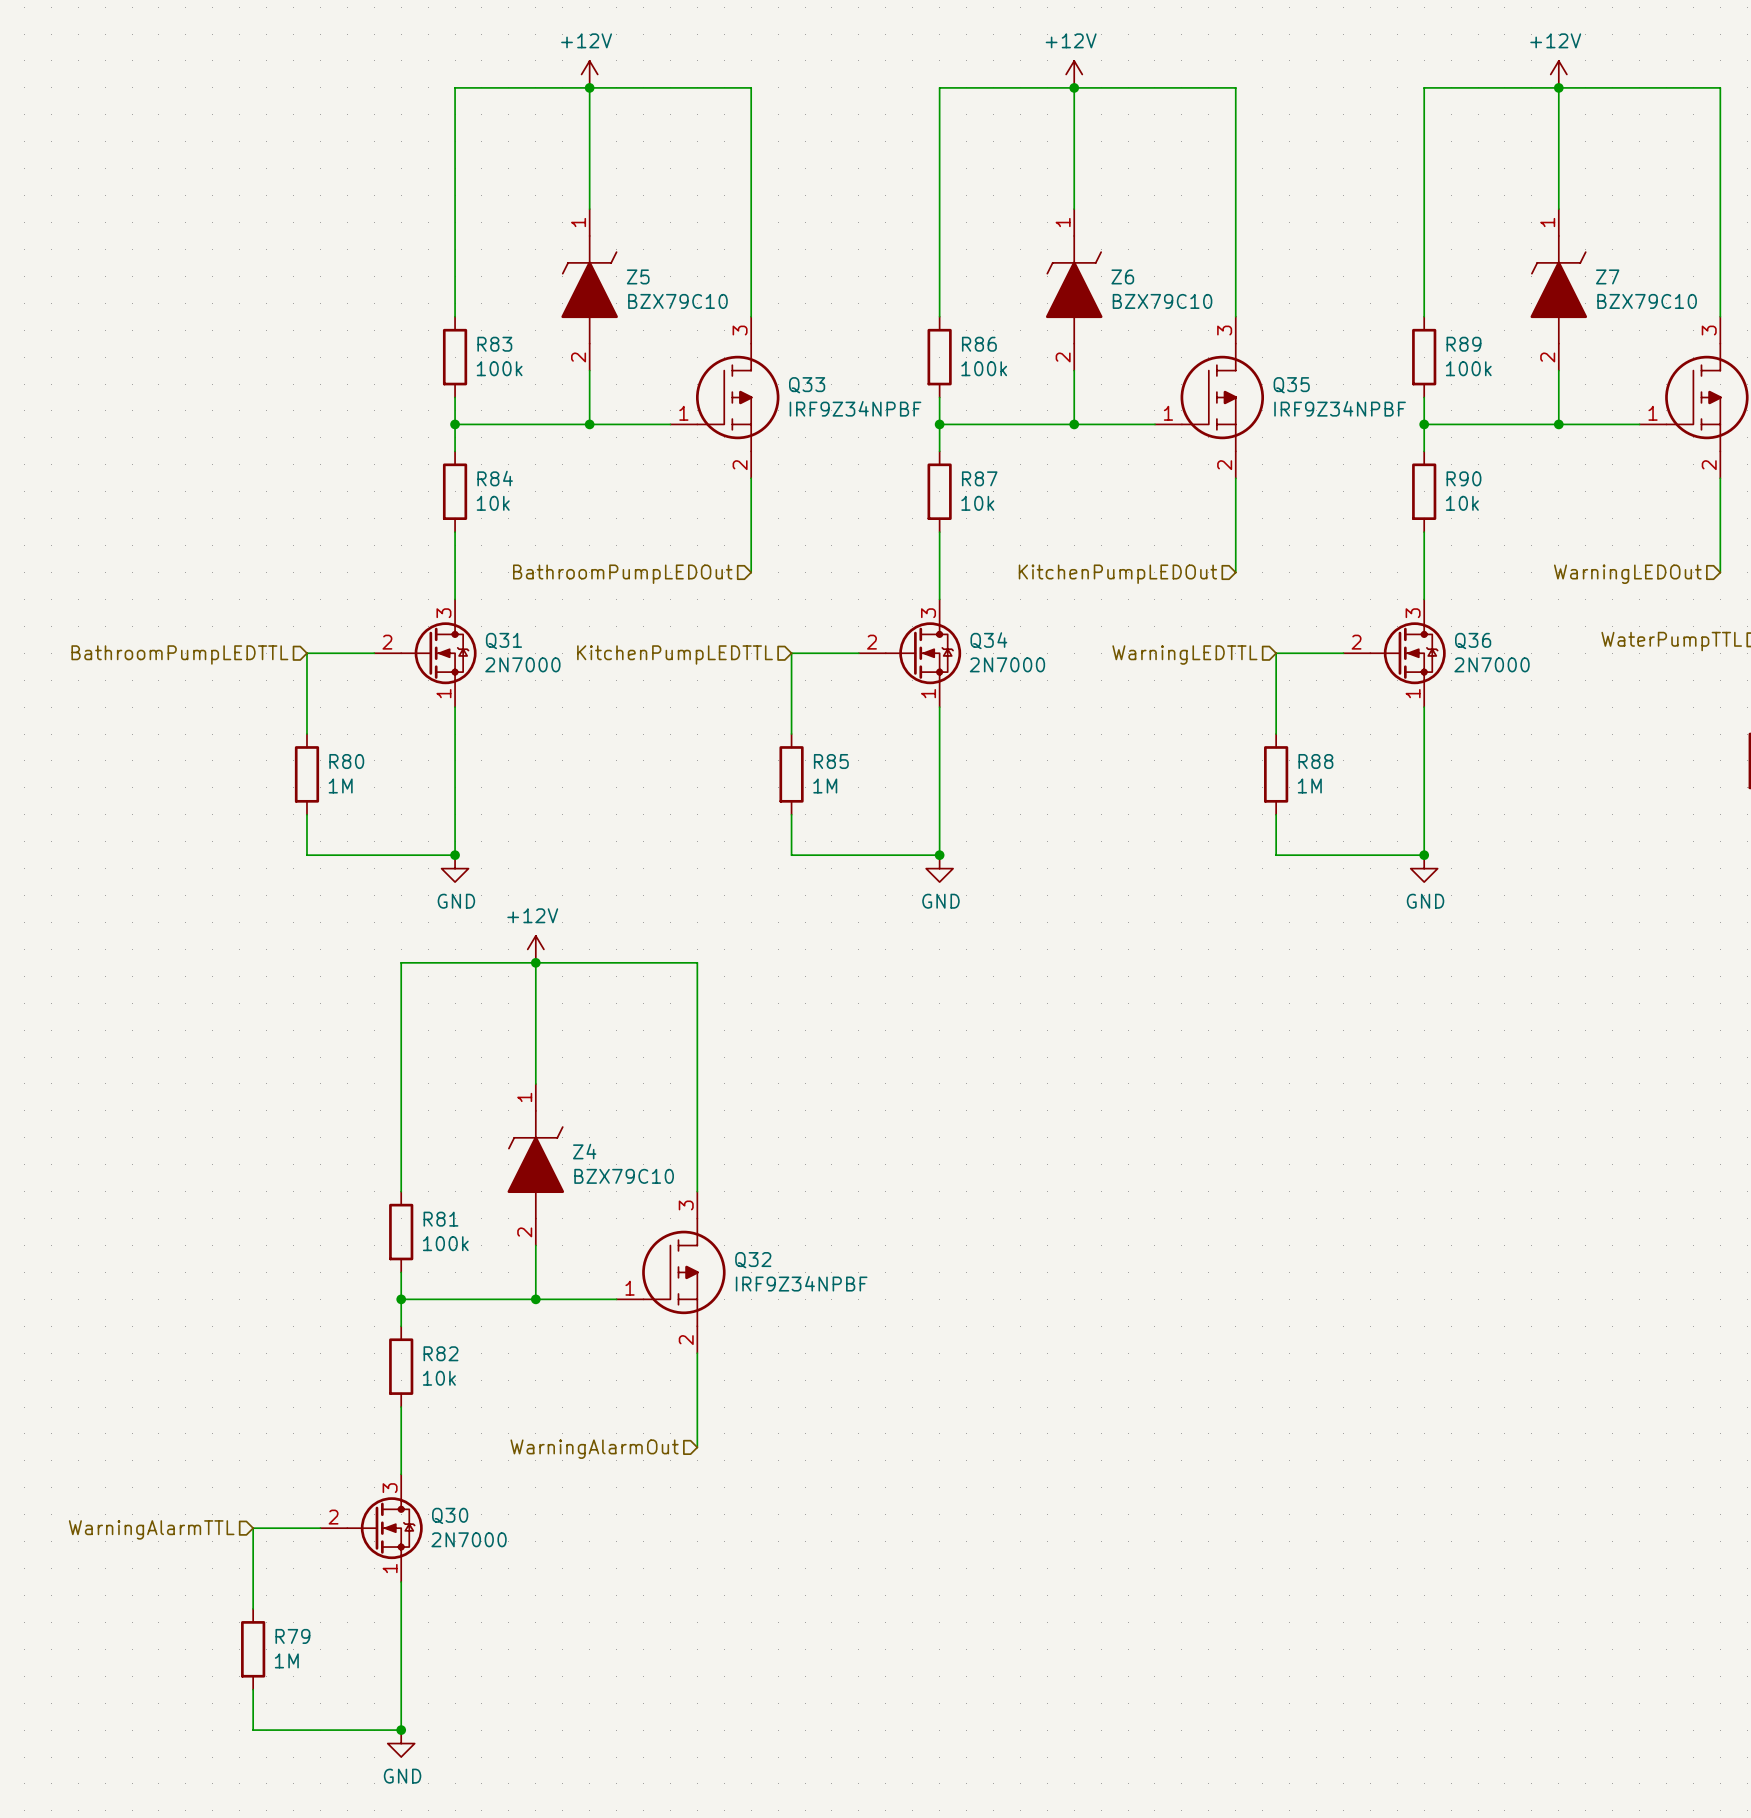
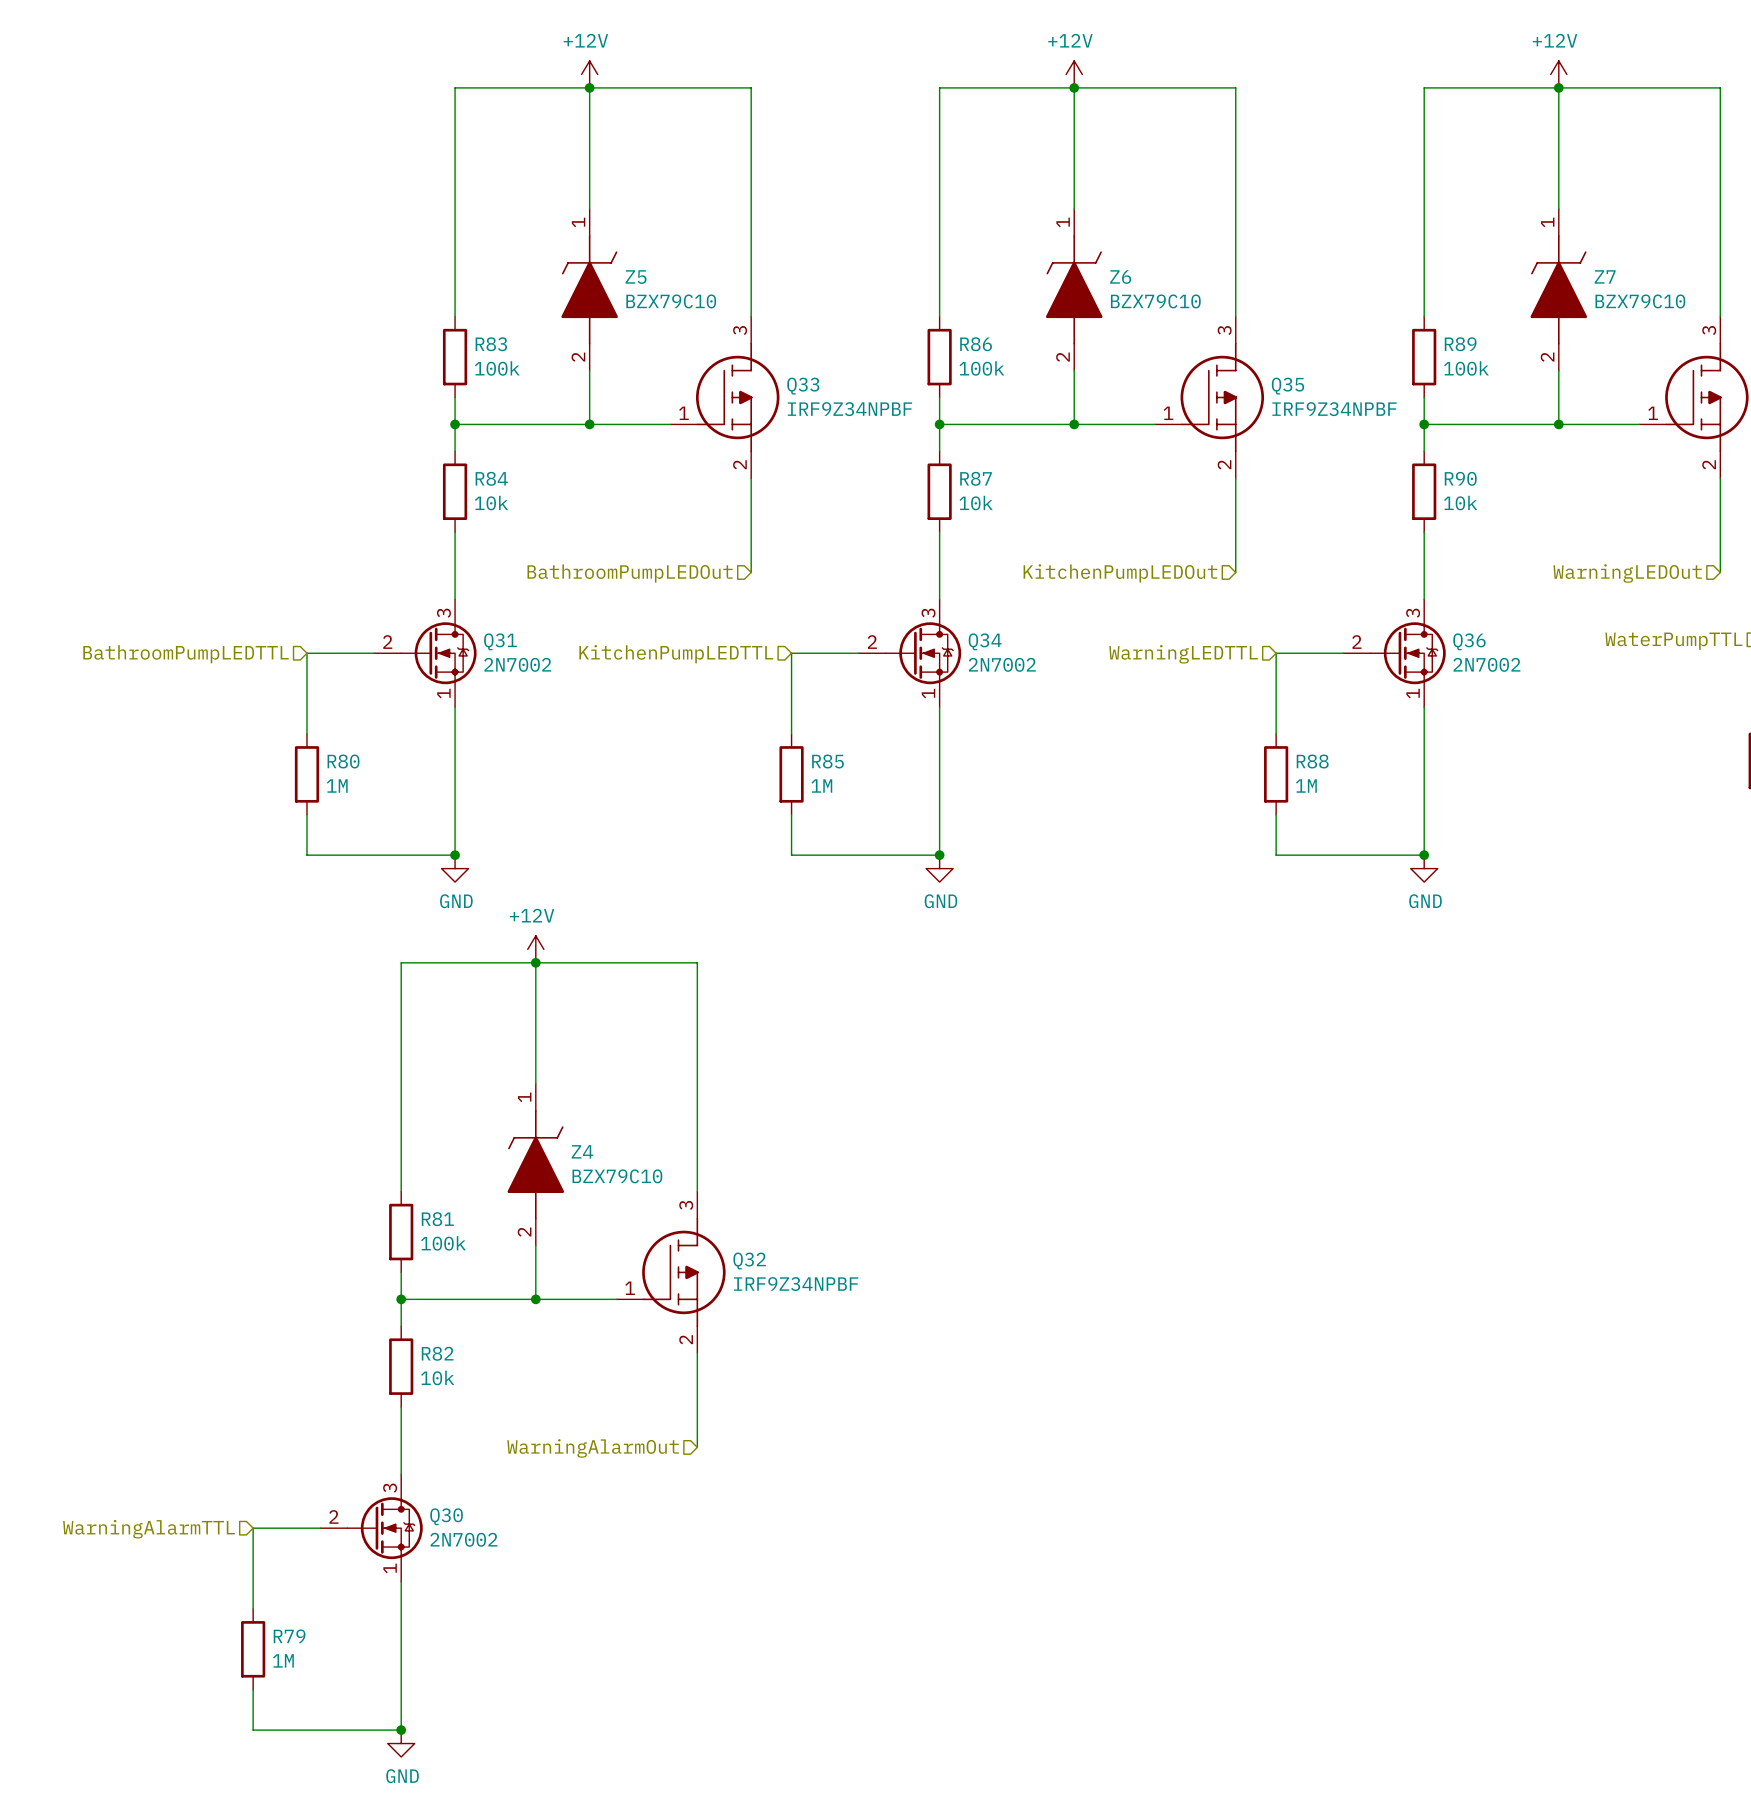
Q31 value: 2N7000 (522, 664) -> 2N7002 (517, 664)
Q34 value: 2N7000 (1007, 664) -> 2N7002 (1002, 664)
Q36 value: 2N7000 (1492, 664) -> 2N7002 (1486, 664)
Q30 value: 2N7000 (469, 1539) -> 2N7002 (463, 1539)

